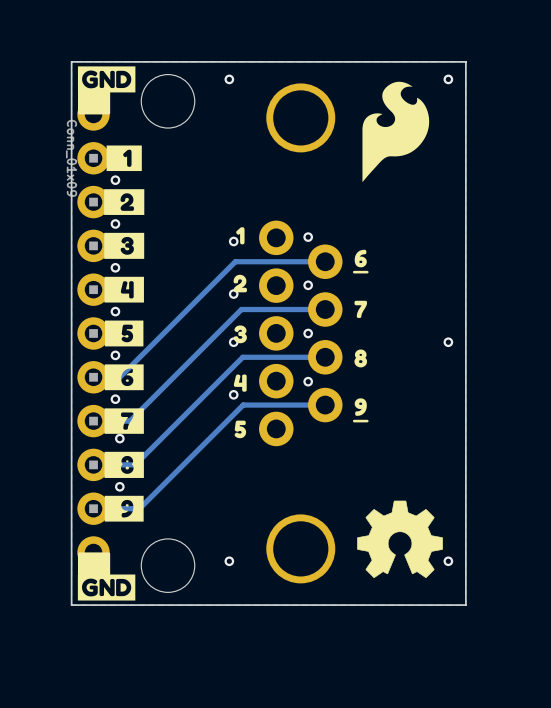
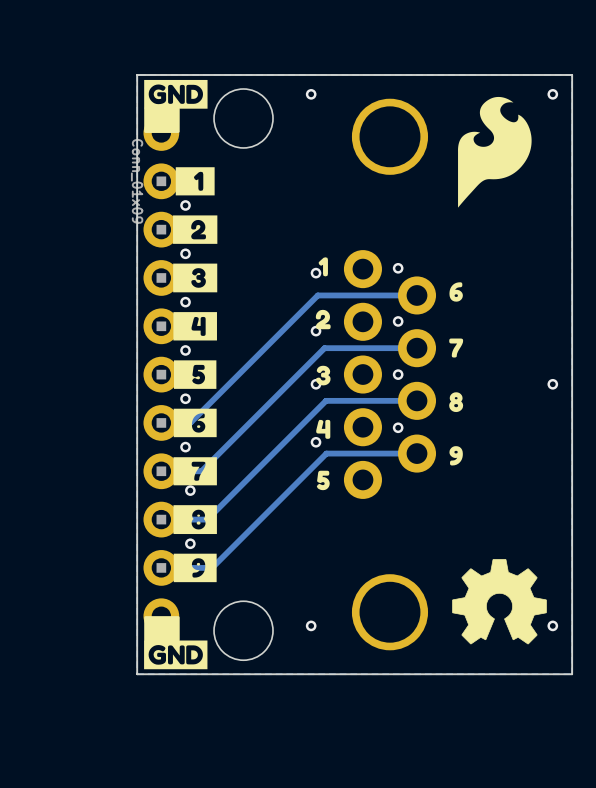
line: (367, 272) (354, 272) -> none
line: (367, 421) (354, 421) -> none

